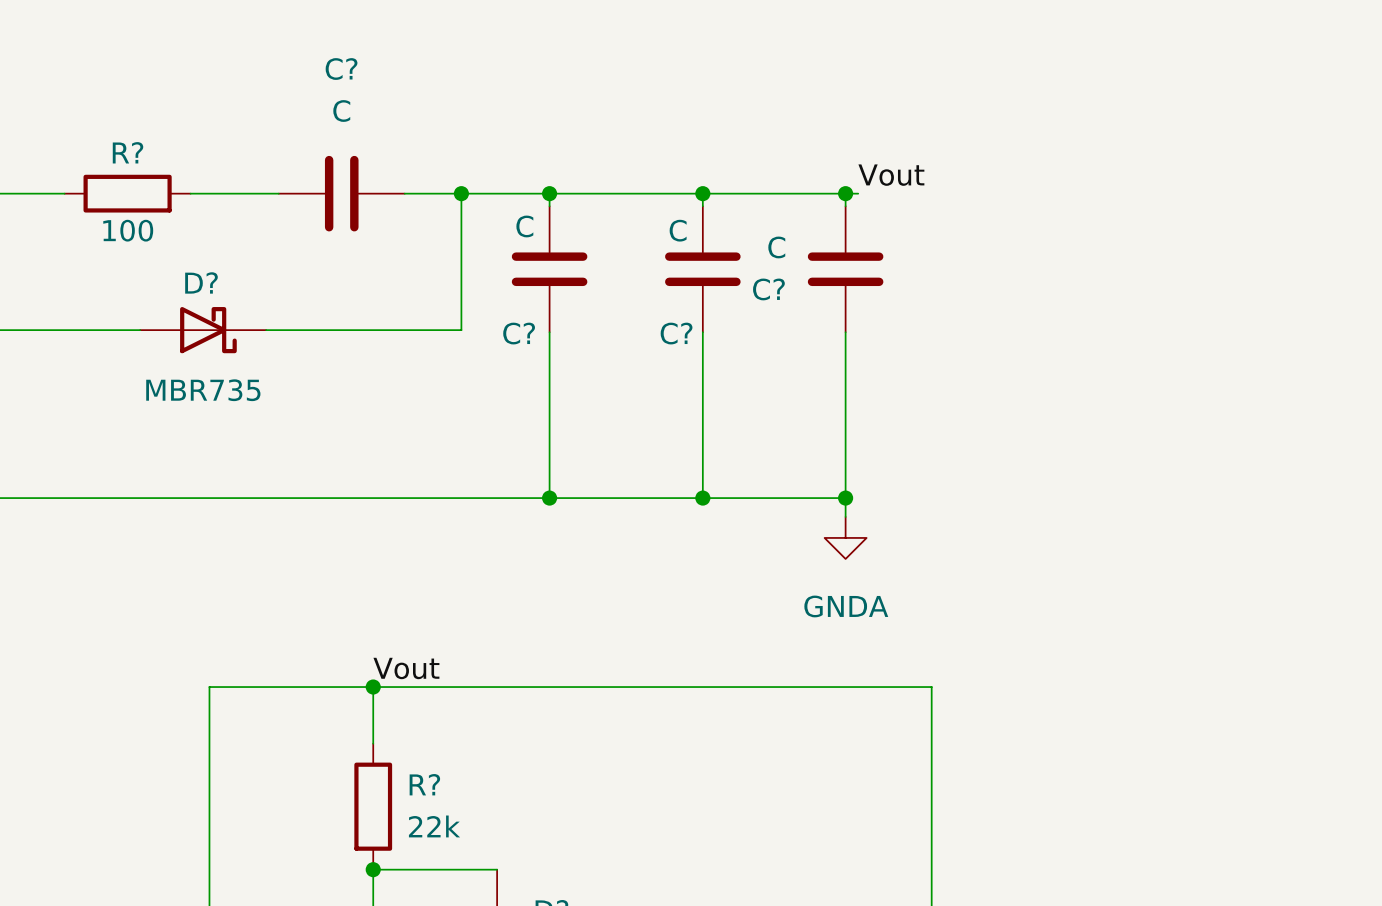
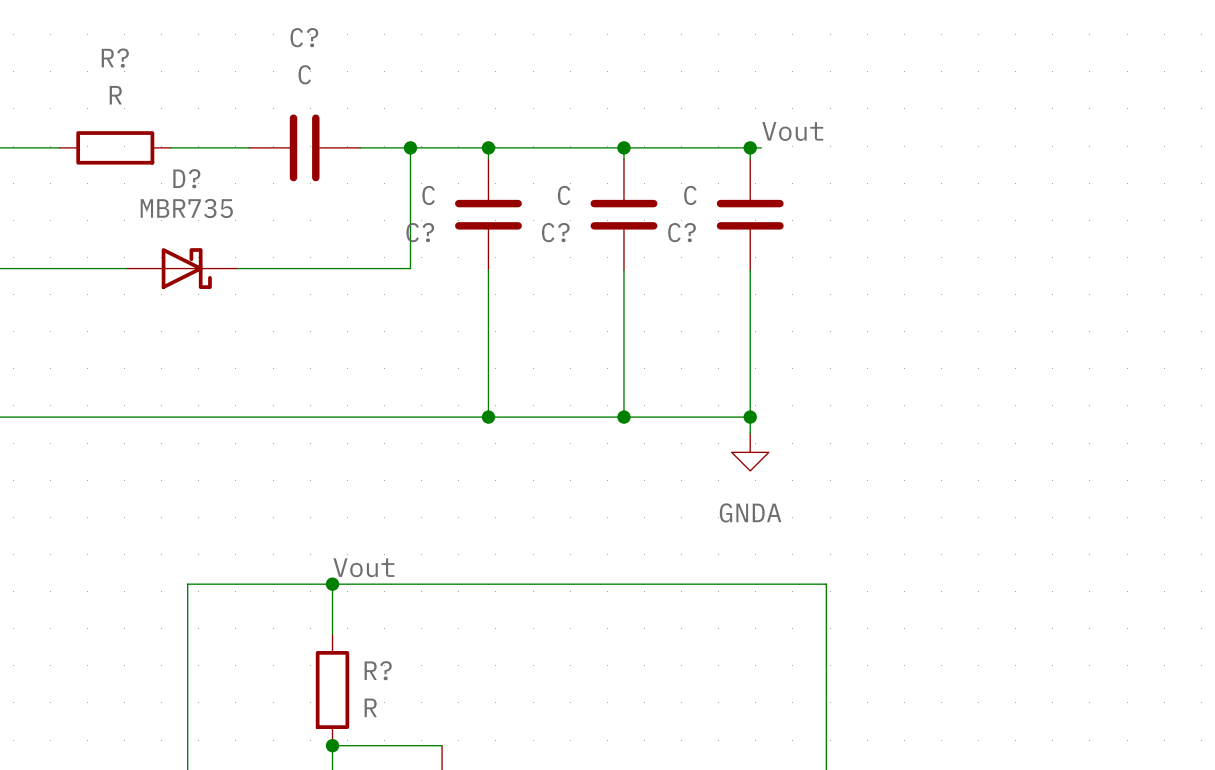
R? name position: R? (128, 152) -> R? (115, 58)
C? value position: C (524, 226) -> C (428, 195)
R? value: 100 (128, 230) -> R (115, 95)
C? value position: C (678, 230) -> C (564, 195)
D? name position: D? (201, 282) -> D? (186, 178)
C? name position: C? (519, 333) -> C? (420, 232)
C? name position: C? (676, 333) -> C? (555, 232)
D? value position: MBR735 (203, 390) -> MBR735 (186, 208)
R? value: 22k (434, 826) -> R (370, 707)

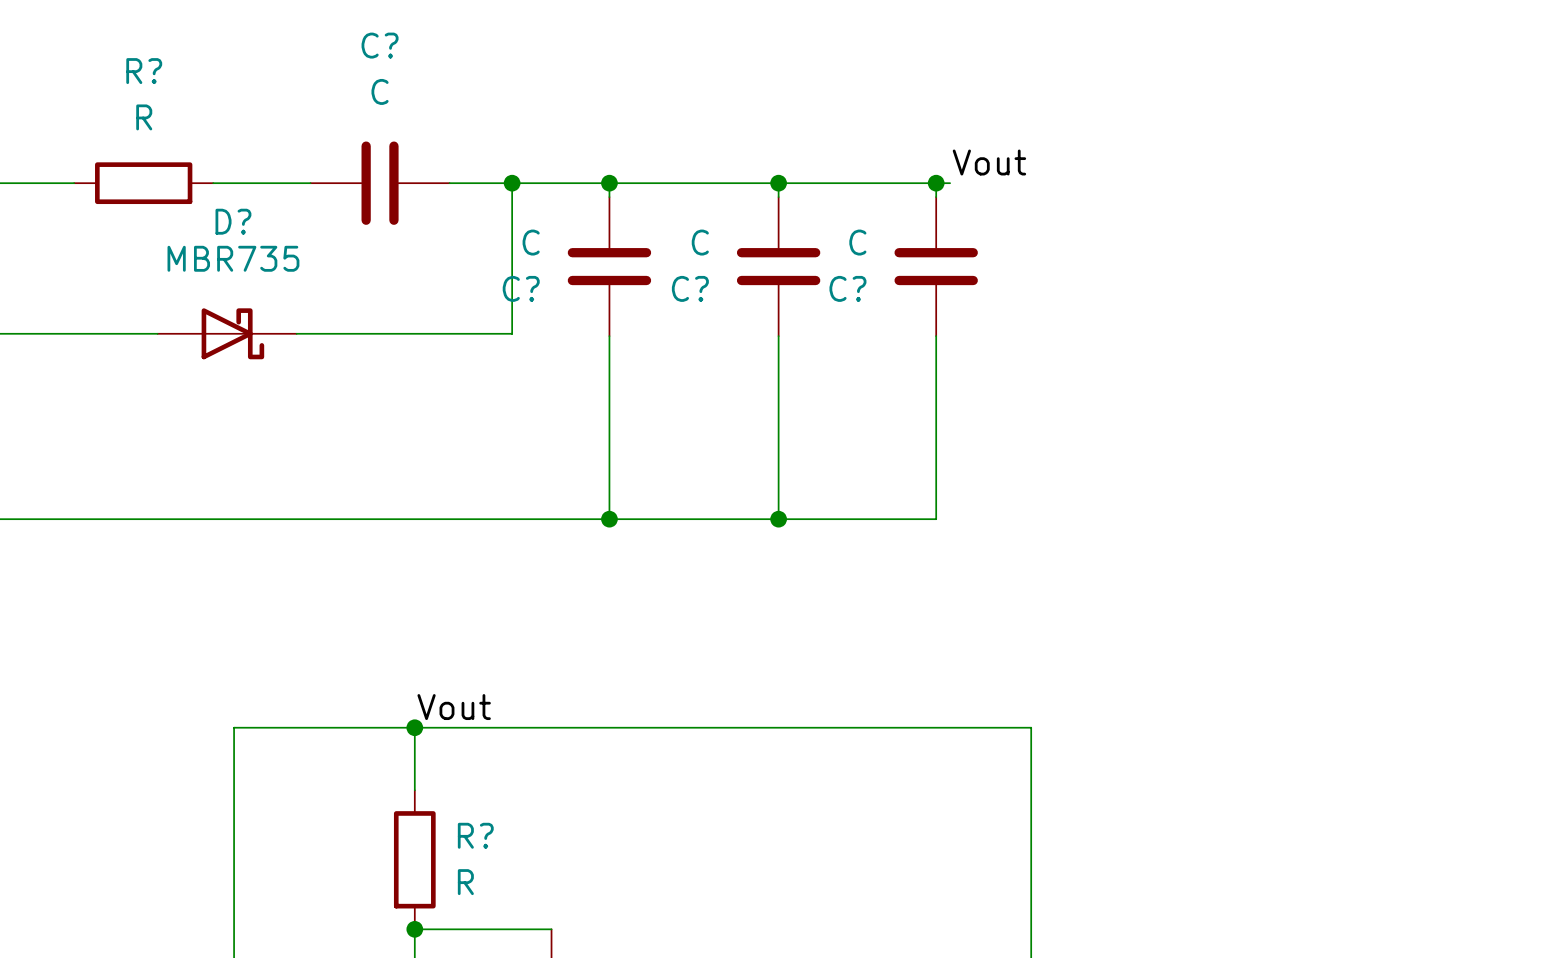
wire: (750, 417) (750, 433) -> none
junction: (750, 417) -> none
power symbol: GNDA (750, 452) -> none

